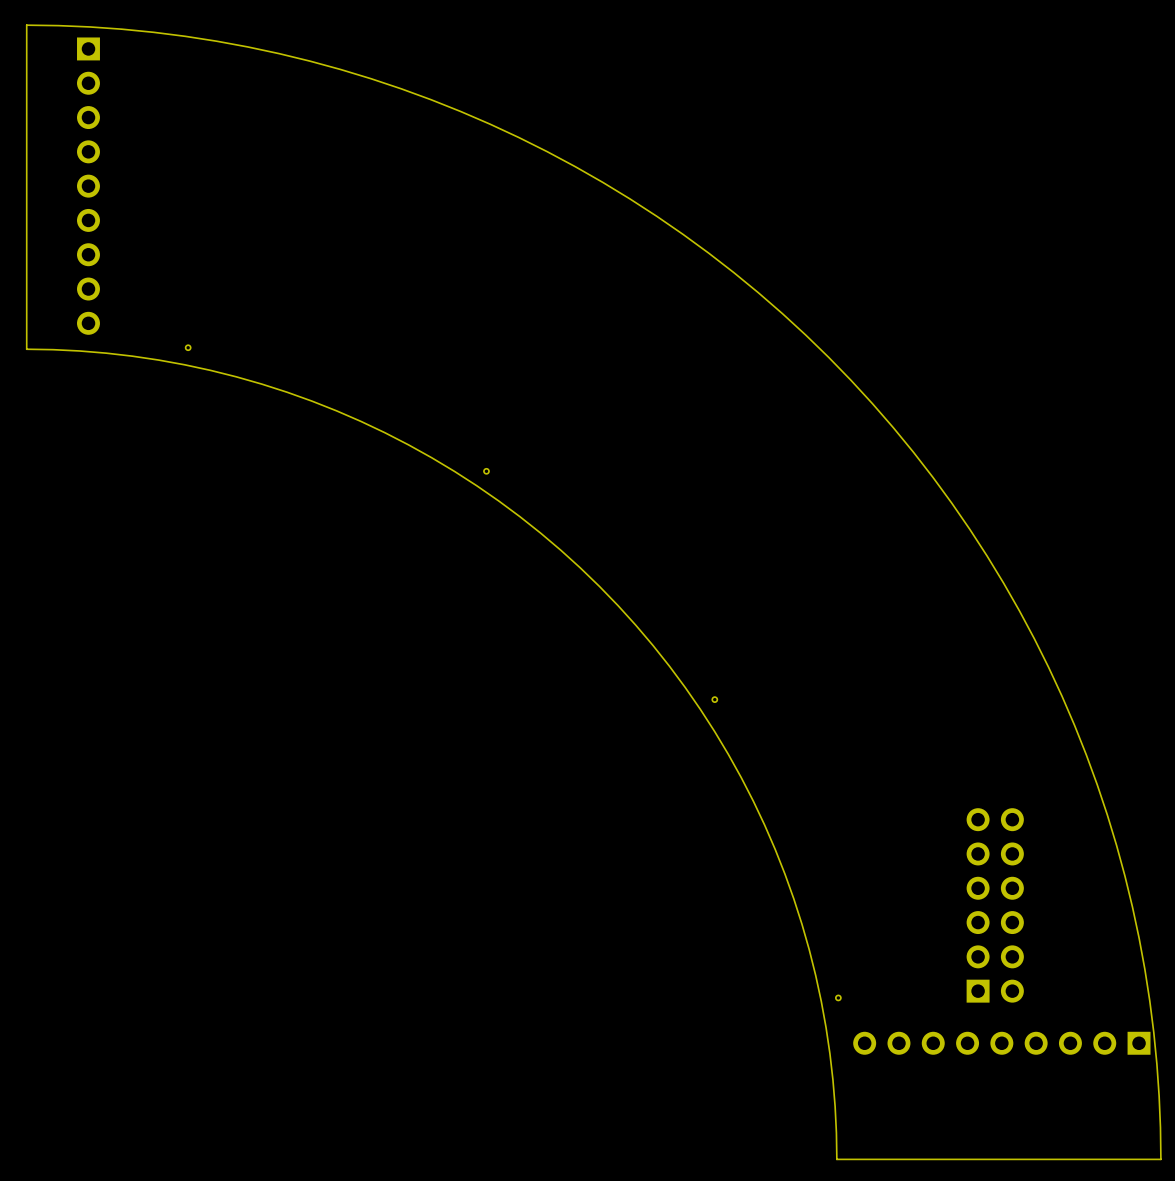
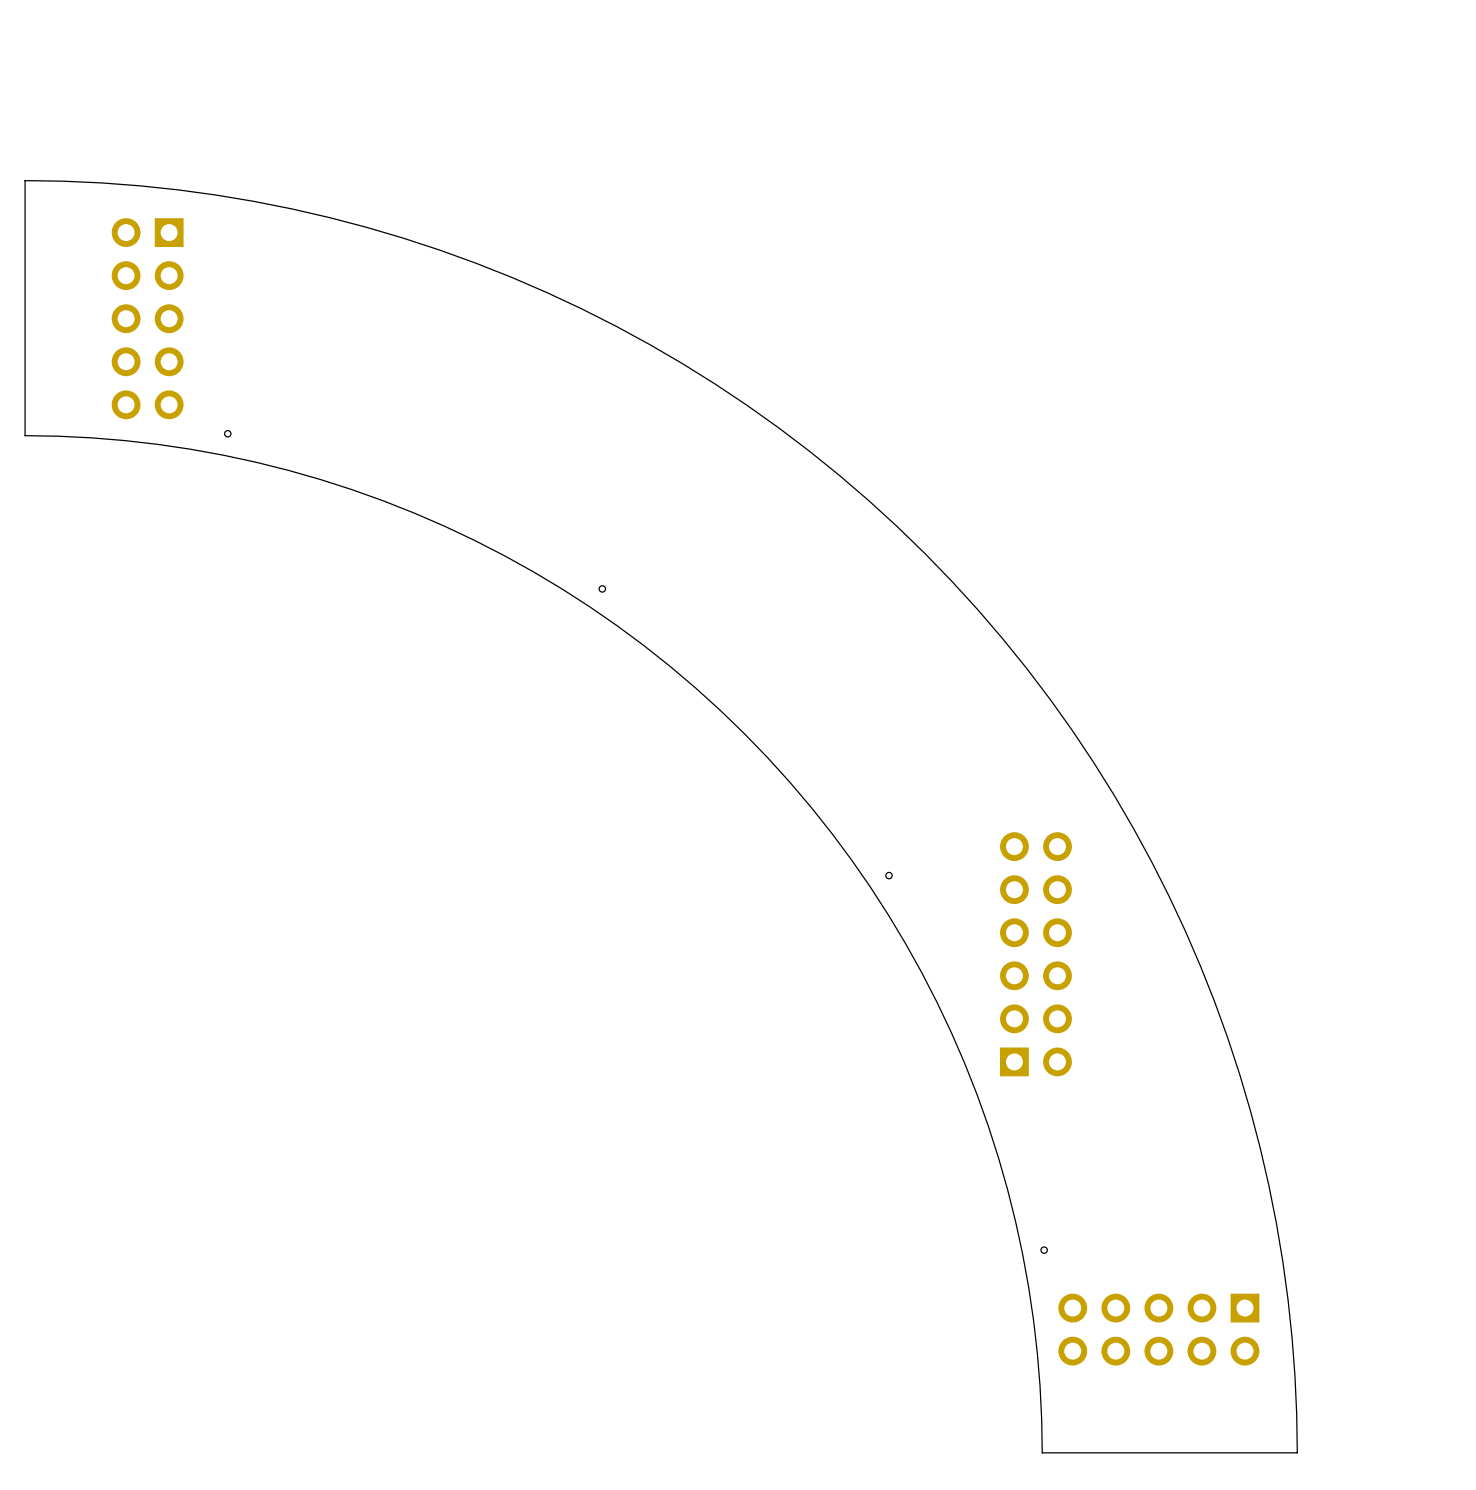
board edge: (26, 146) (26, 25) (90, 26) (153, 32) (247, 46) (310, 61) (401, 88) (460, 111) (518, 137) (575, 166) (630, 199) (708, 253) (758, 292) (828, 357) (893, 427) (932, 477) (969, 529) (1019, 610) (1048, 667) (1074, 725) (1097, 784) (1124, 876) (1139, 938) (1149, 1000) (1159, 1095) (1160, 1159) (1039, 1159) -> (25, 180) (140, 185) (216, 195) (292, 208) (403, 238) (511, 277) (616, 326) (683, 364) (747, 405) (839, 475) (924, 553) (1002, 638) (1072, 730) (1113, 794) (1151, 861) (1200, 965) (1239, 1074) (1260, 1148) (1276, 1223) (1292, 1337) (1297, 1452)
part: (88, 186) -> none
part: none -> (147, 318)
part position: (995, 905) -> (1035, 954)
part: (1001, 1043) -> none
part: none -> (1158, 1329)

